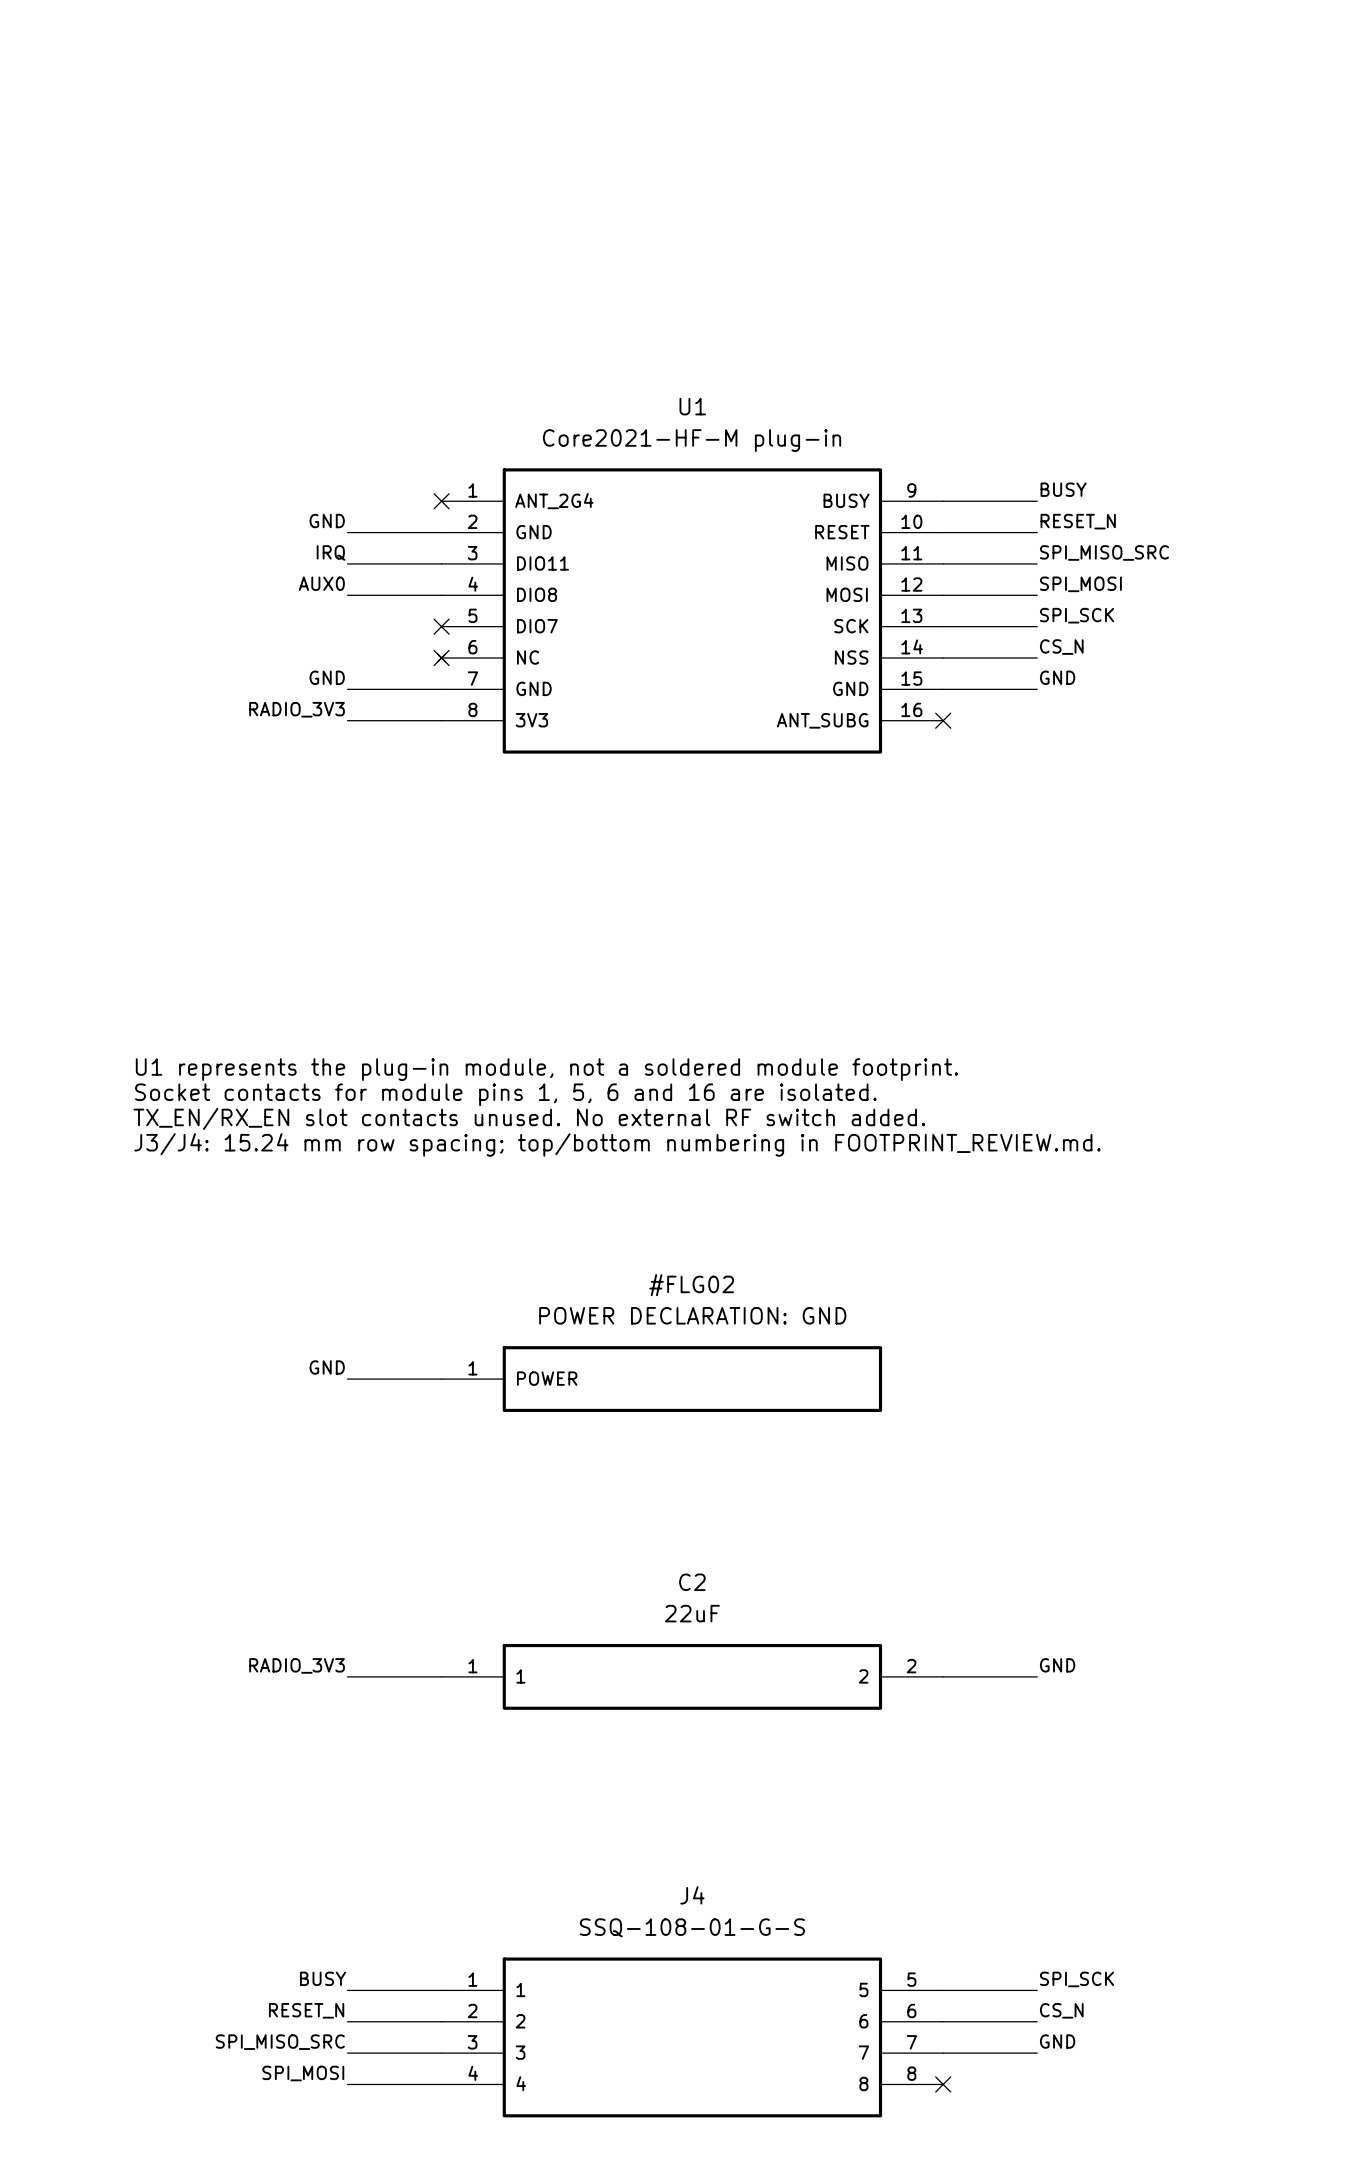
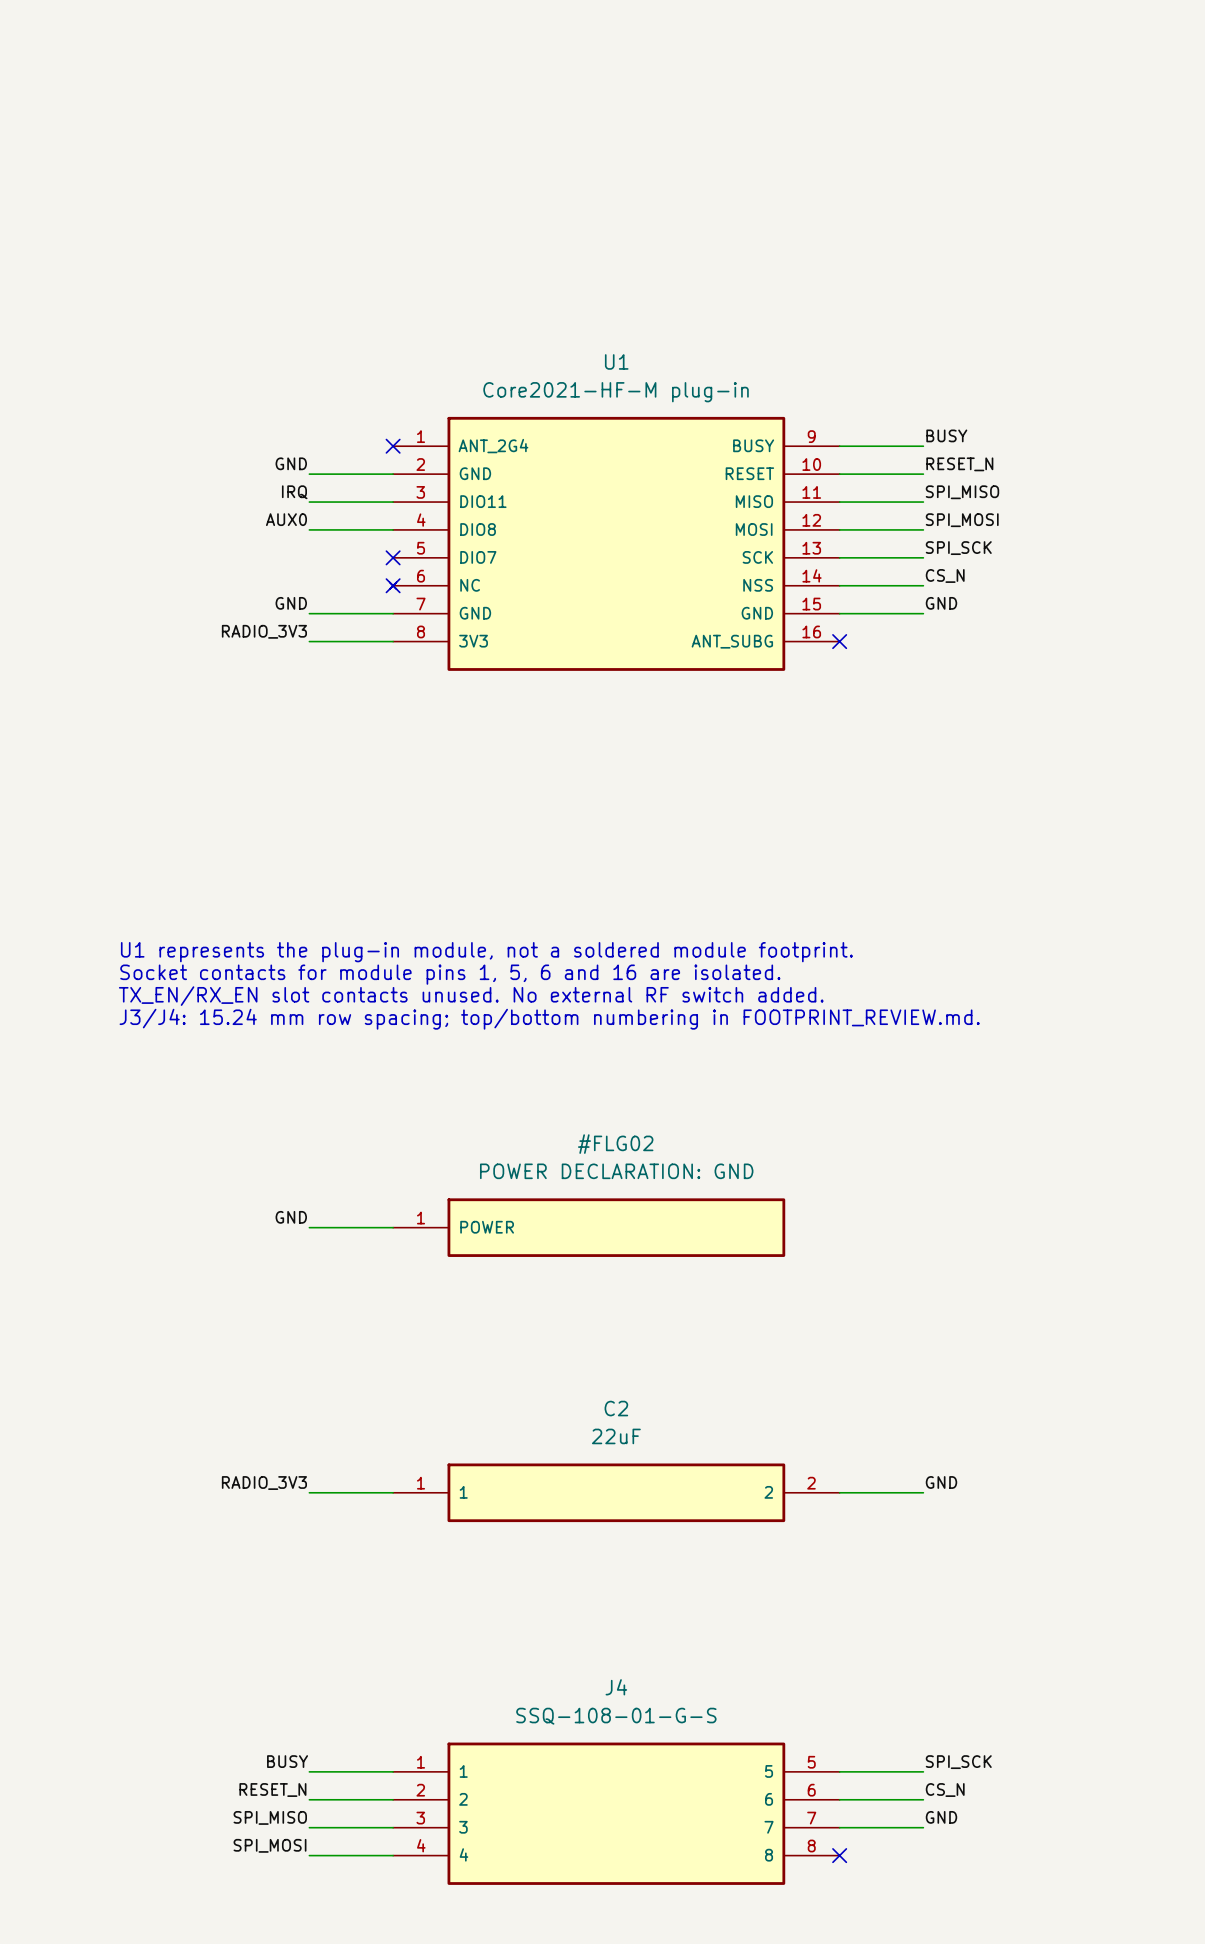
label: SPI_MISO_SRC (1104, 552) -> SPI_MISO (962, 492)
label: SPI_MISO_SRC (280, 2042) -> SPI_MISO (270, 1817)

